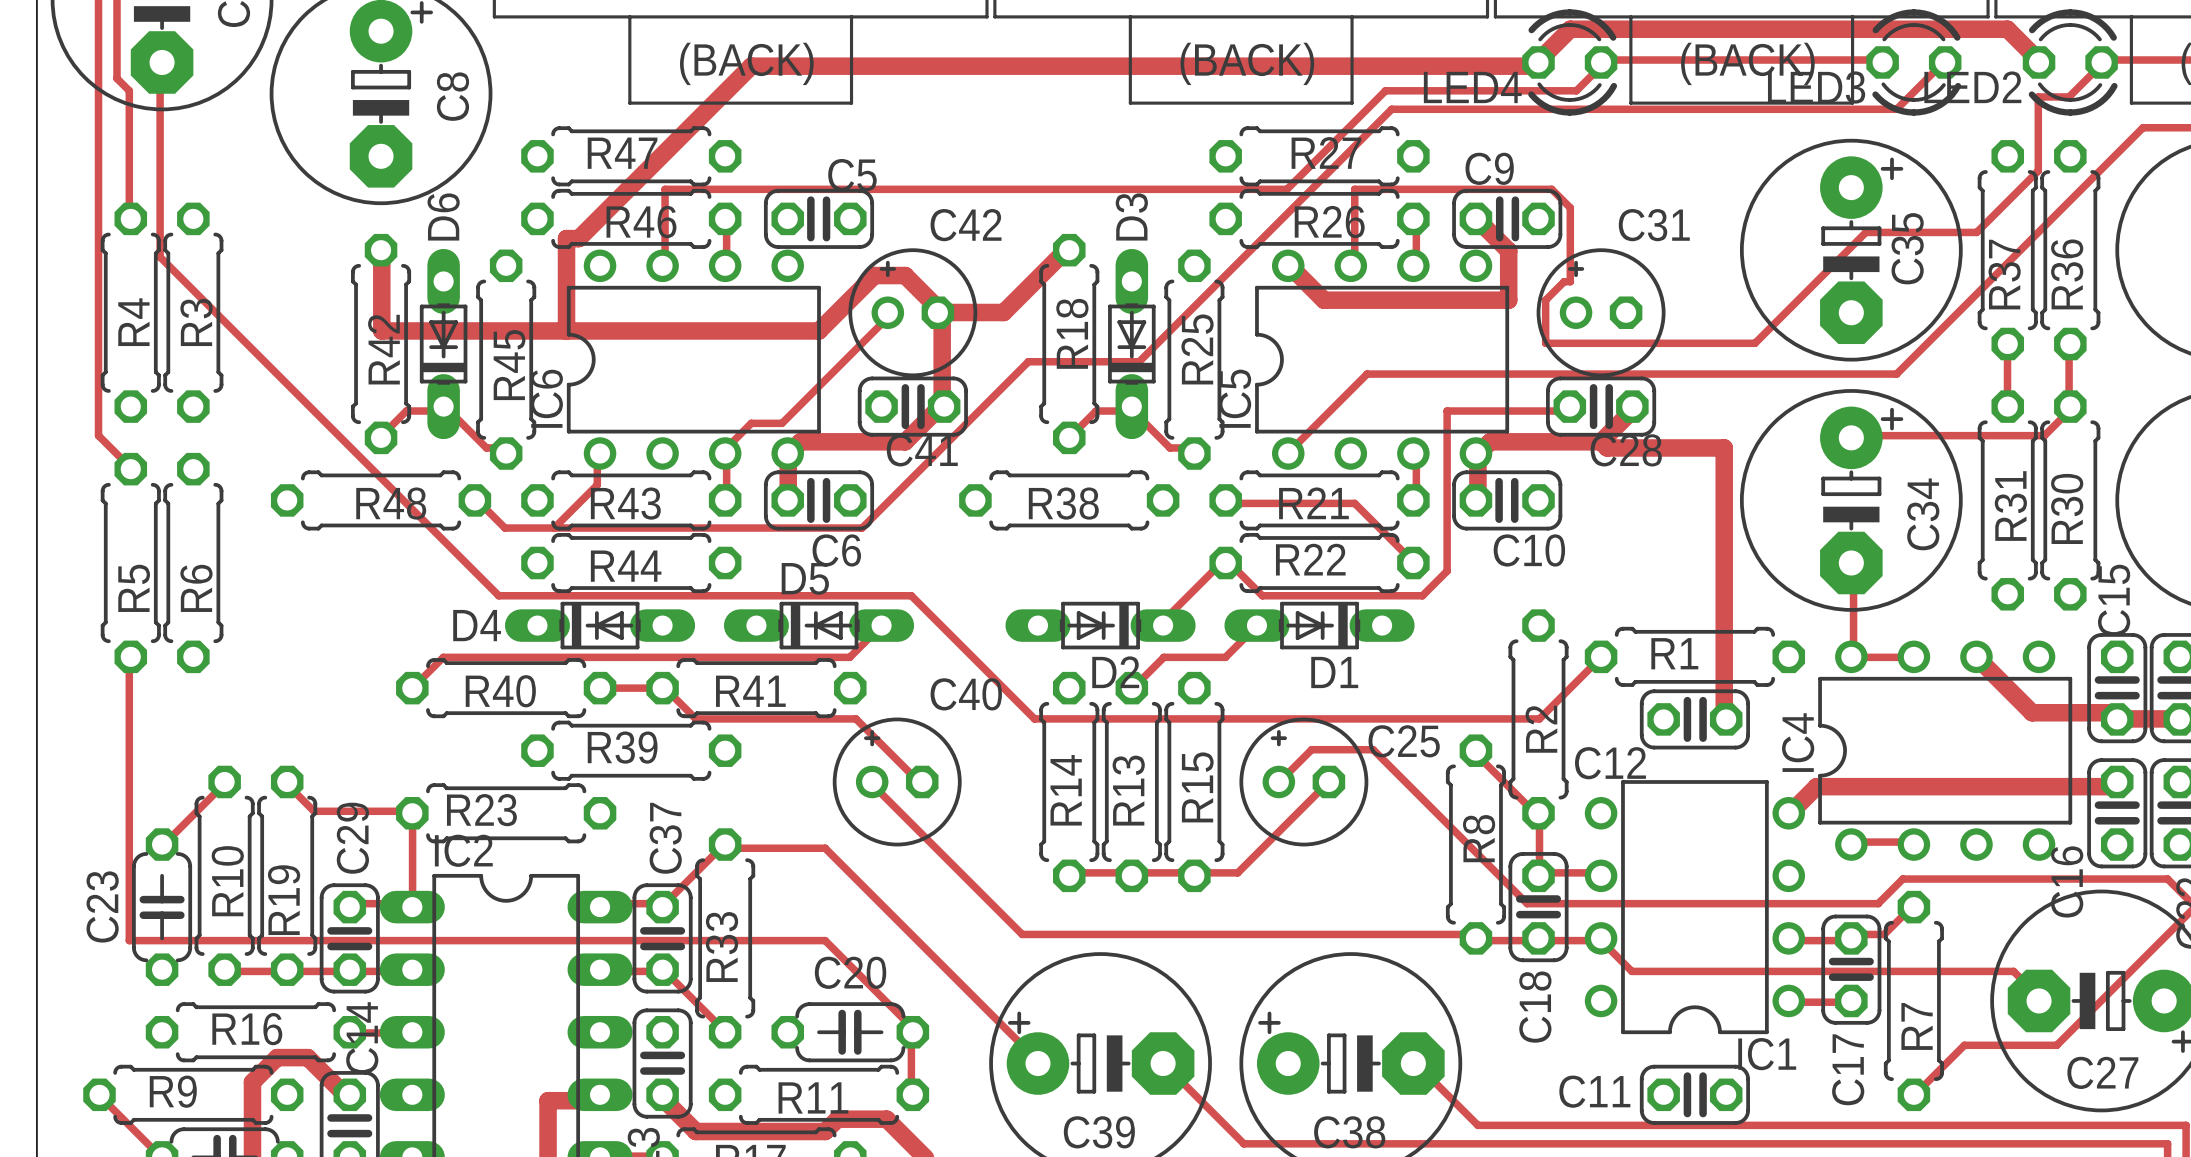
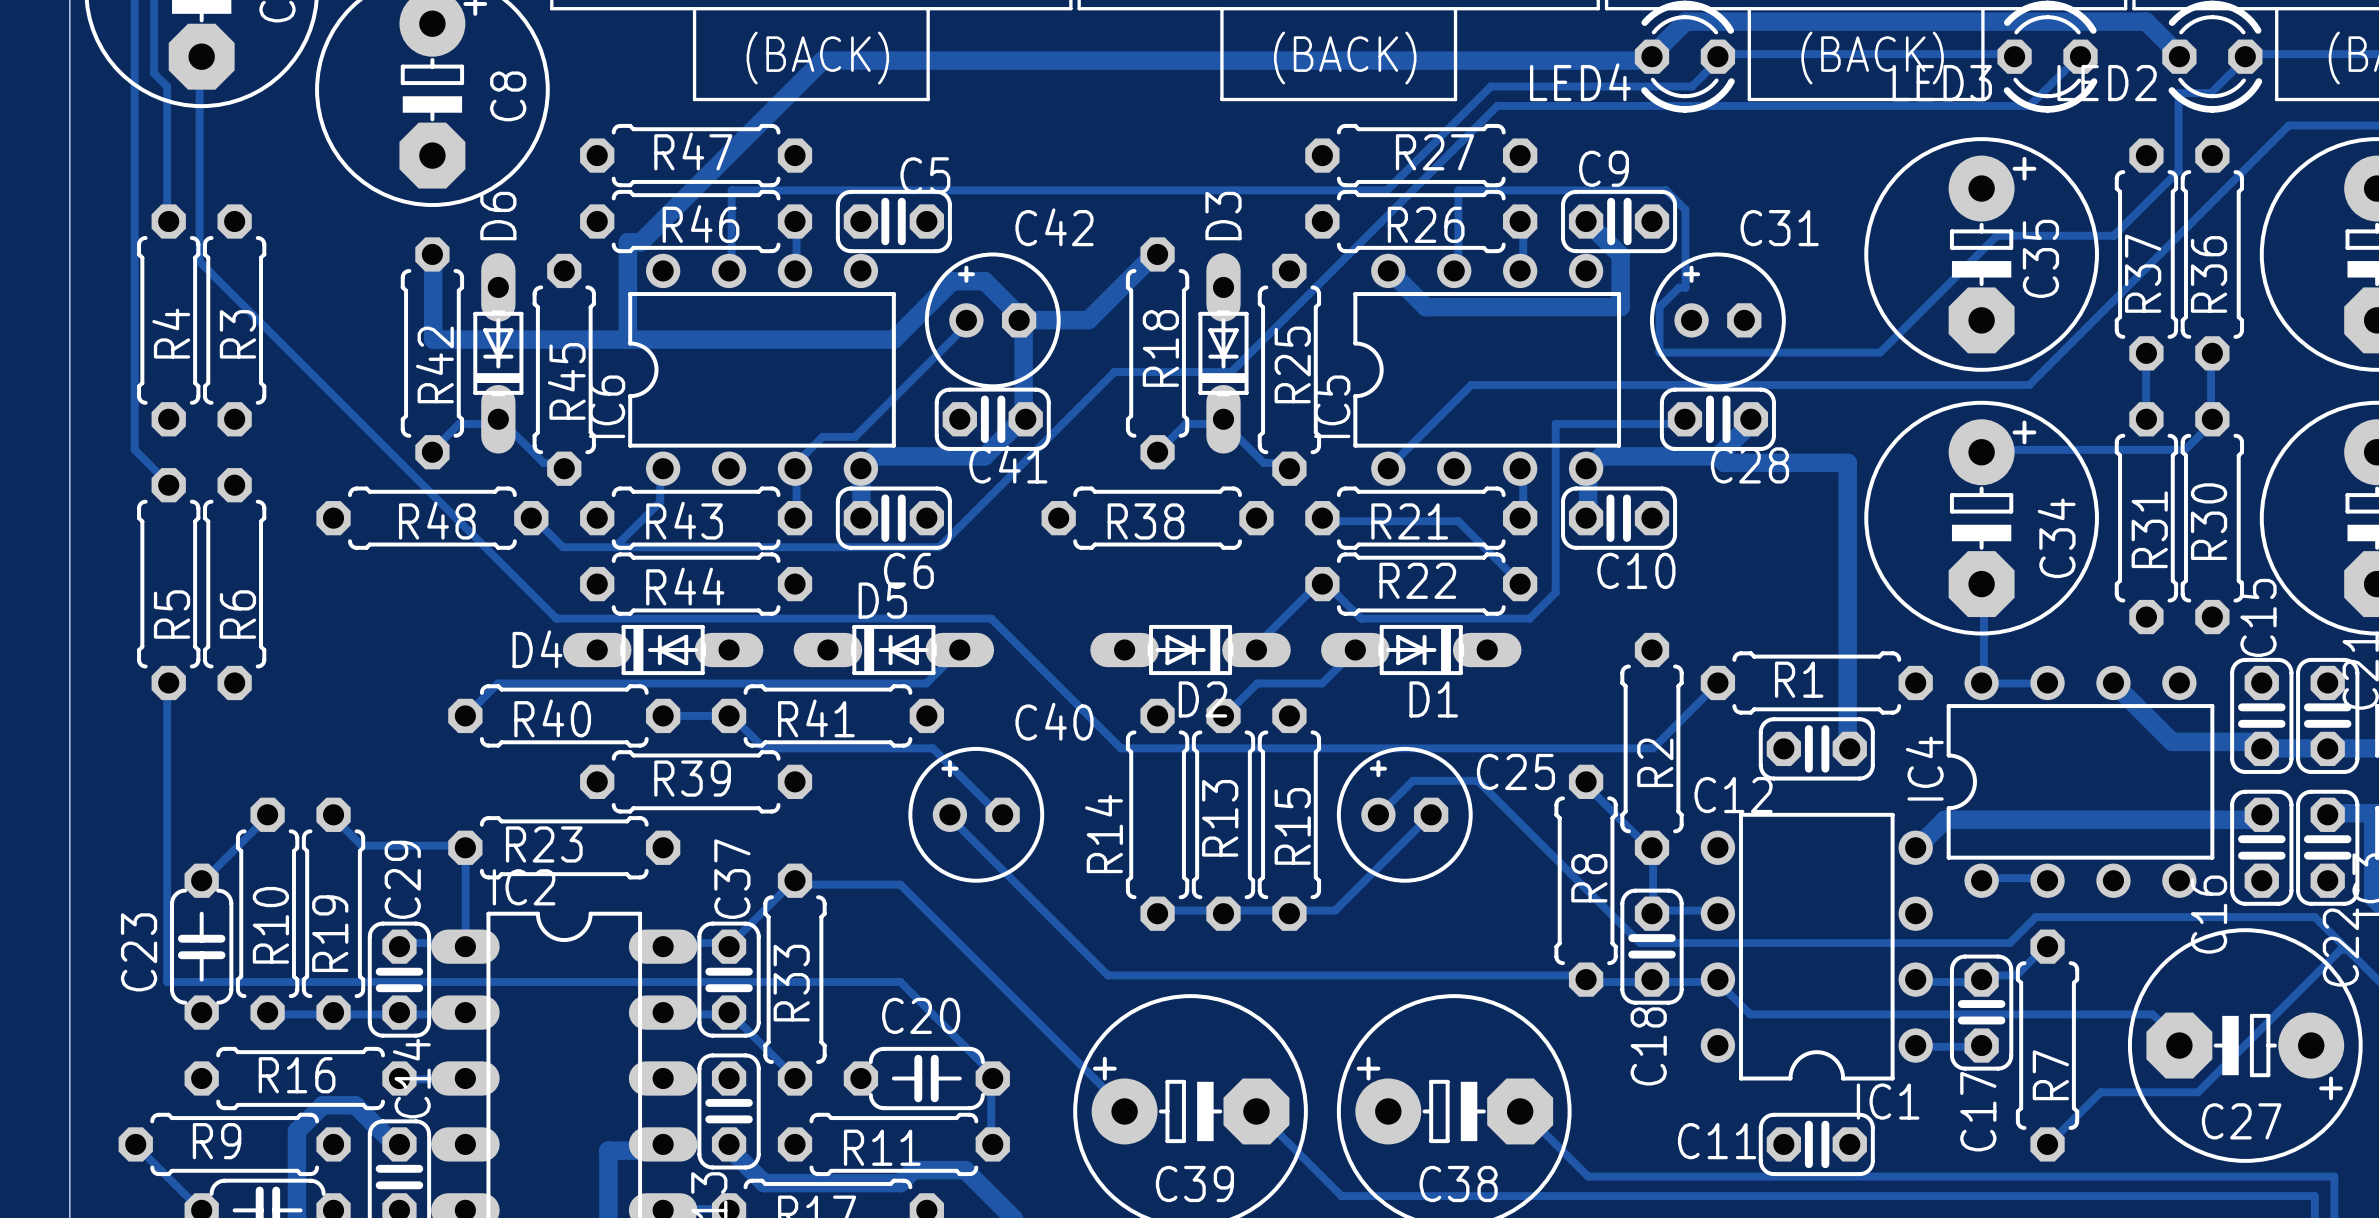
R14 name position: R14 (1066, 790) -> R14 (1104, 834)

